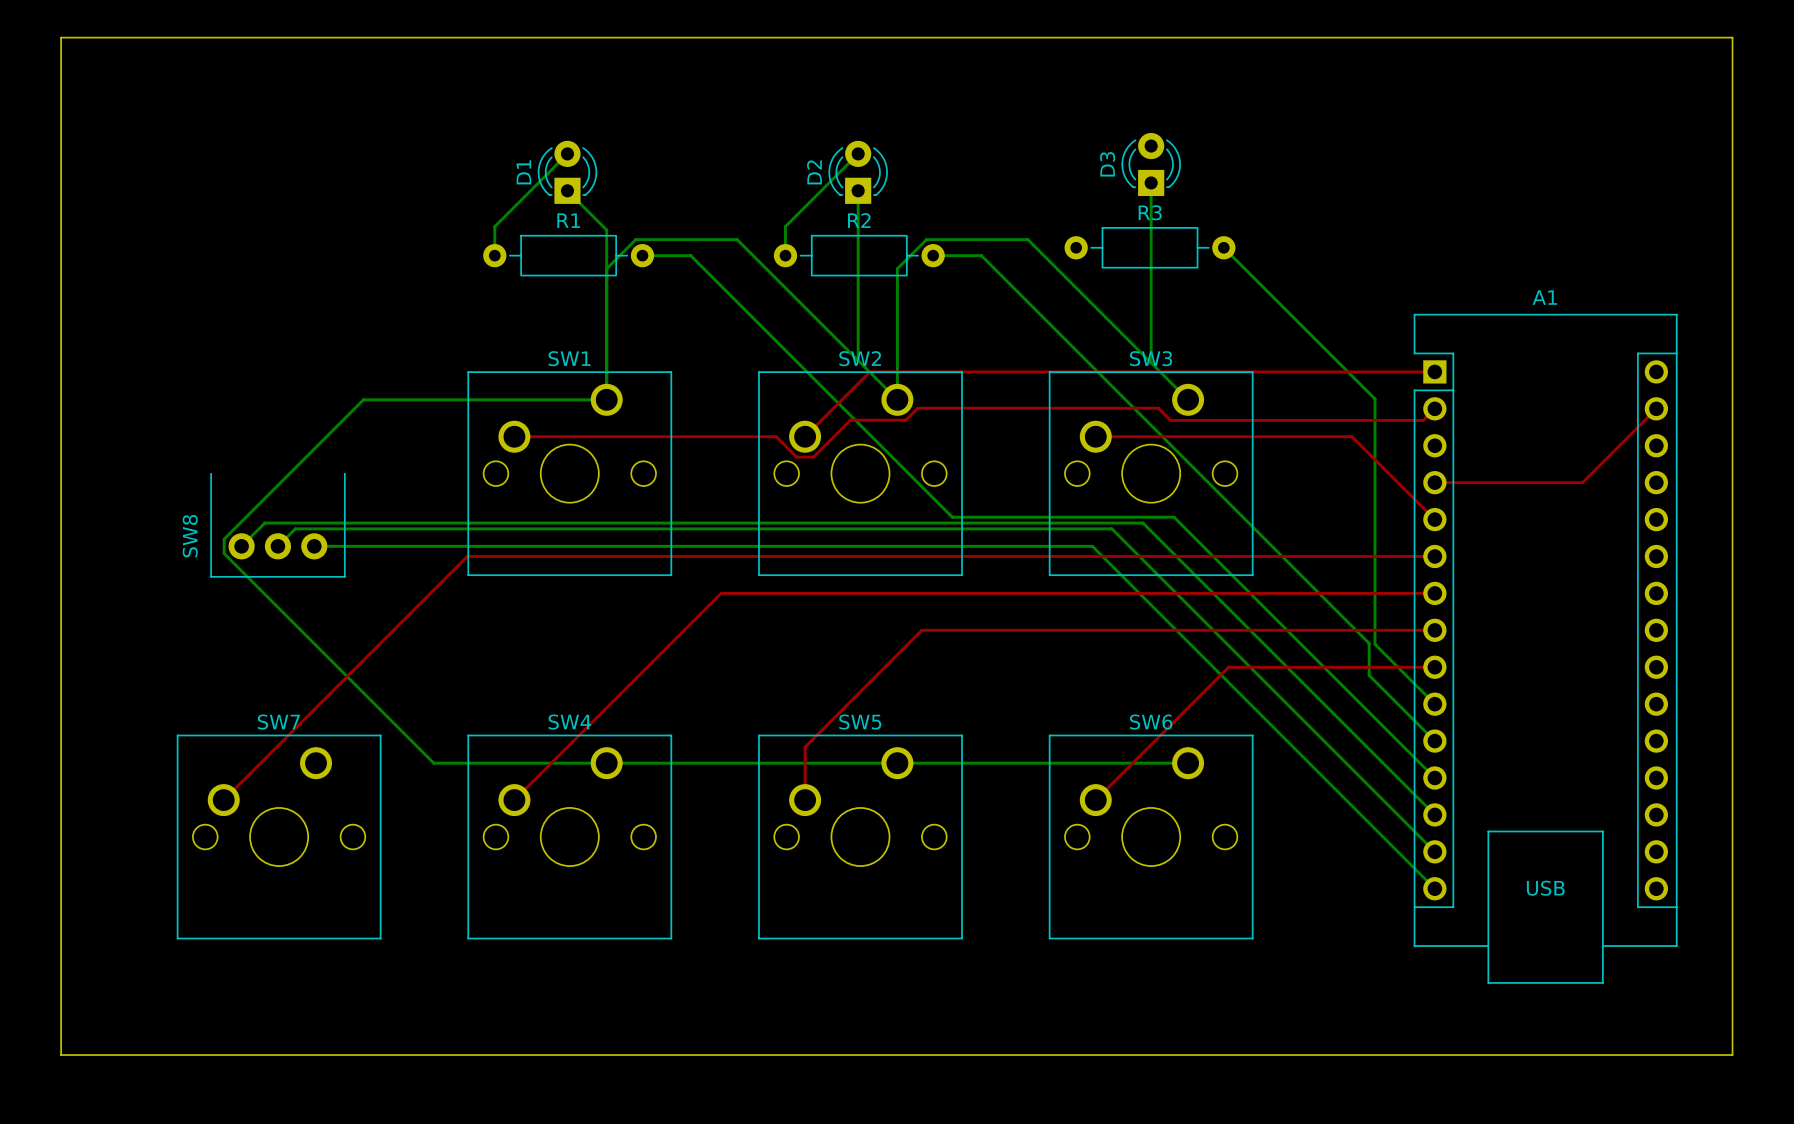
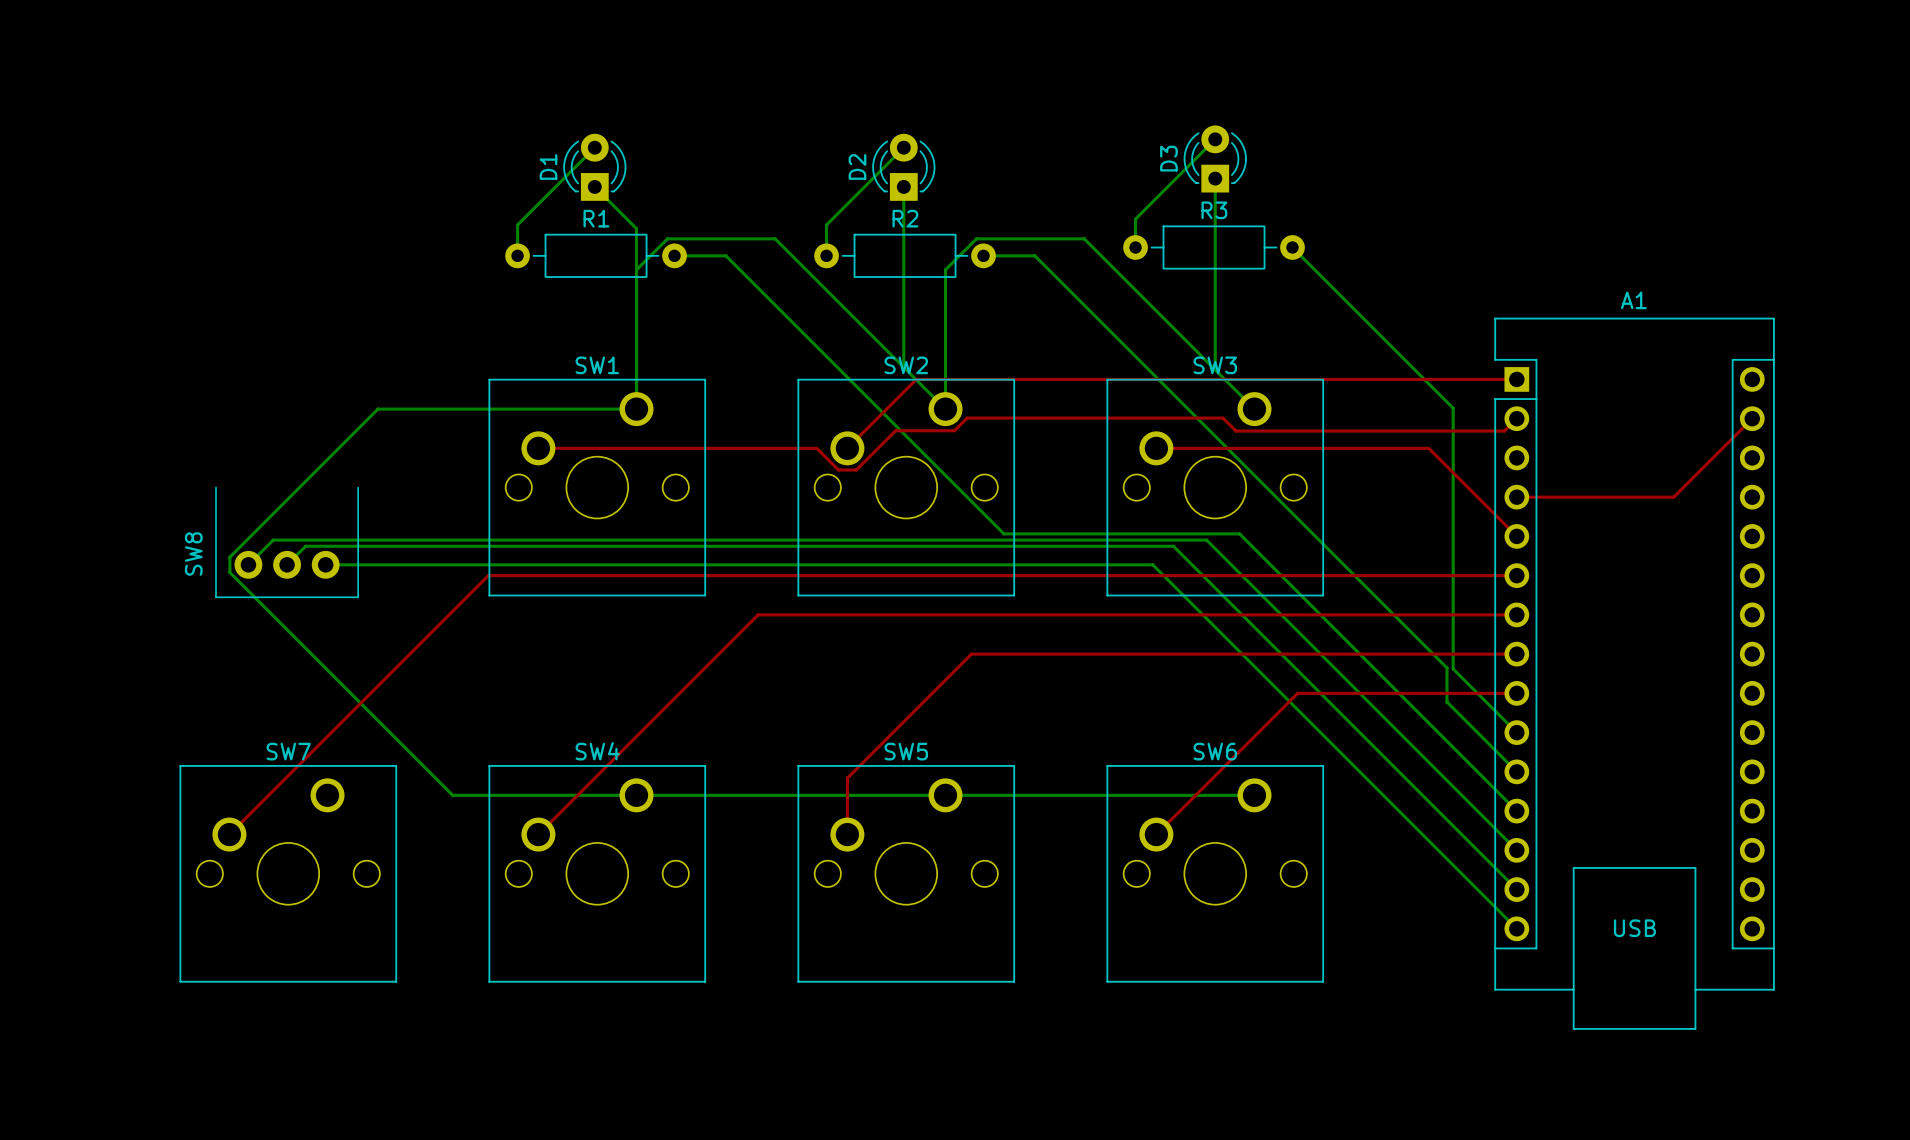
board edge: (61, 37) (1732, 37) (1732, 1055) (61, 1055) (61, 37) -> none
bottom track: none -> (1215, 139) (1135, 219) (1135, 247)

